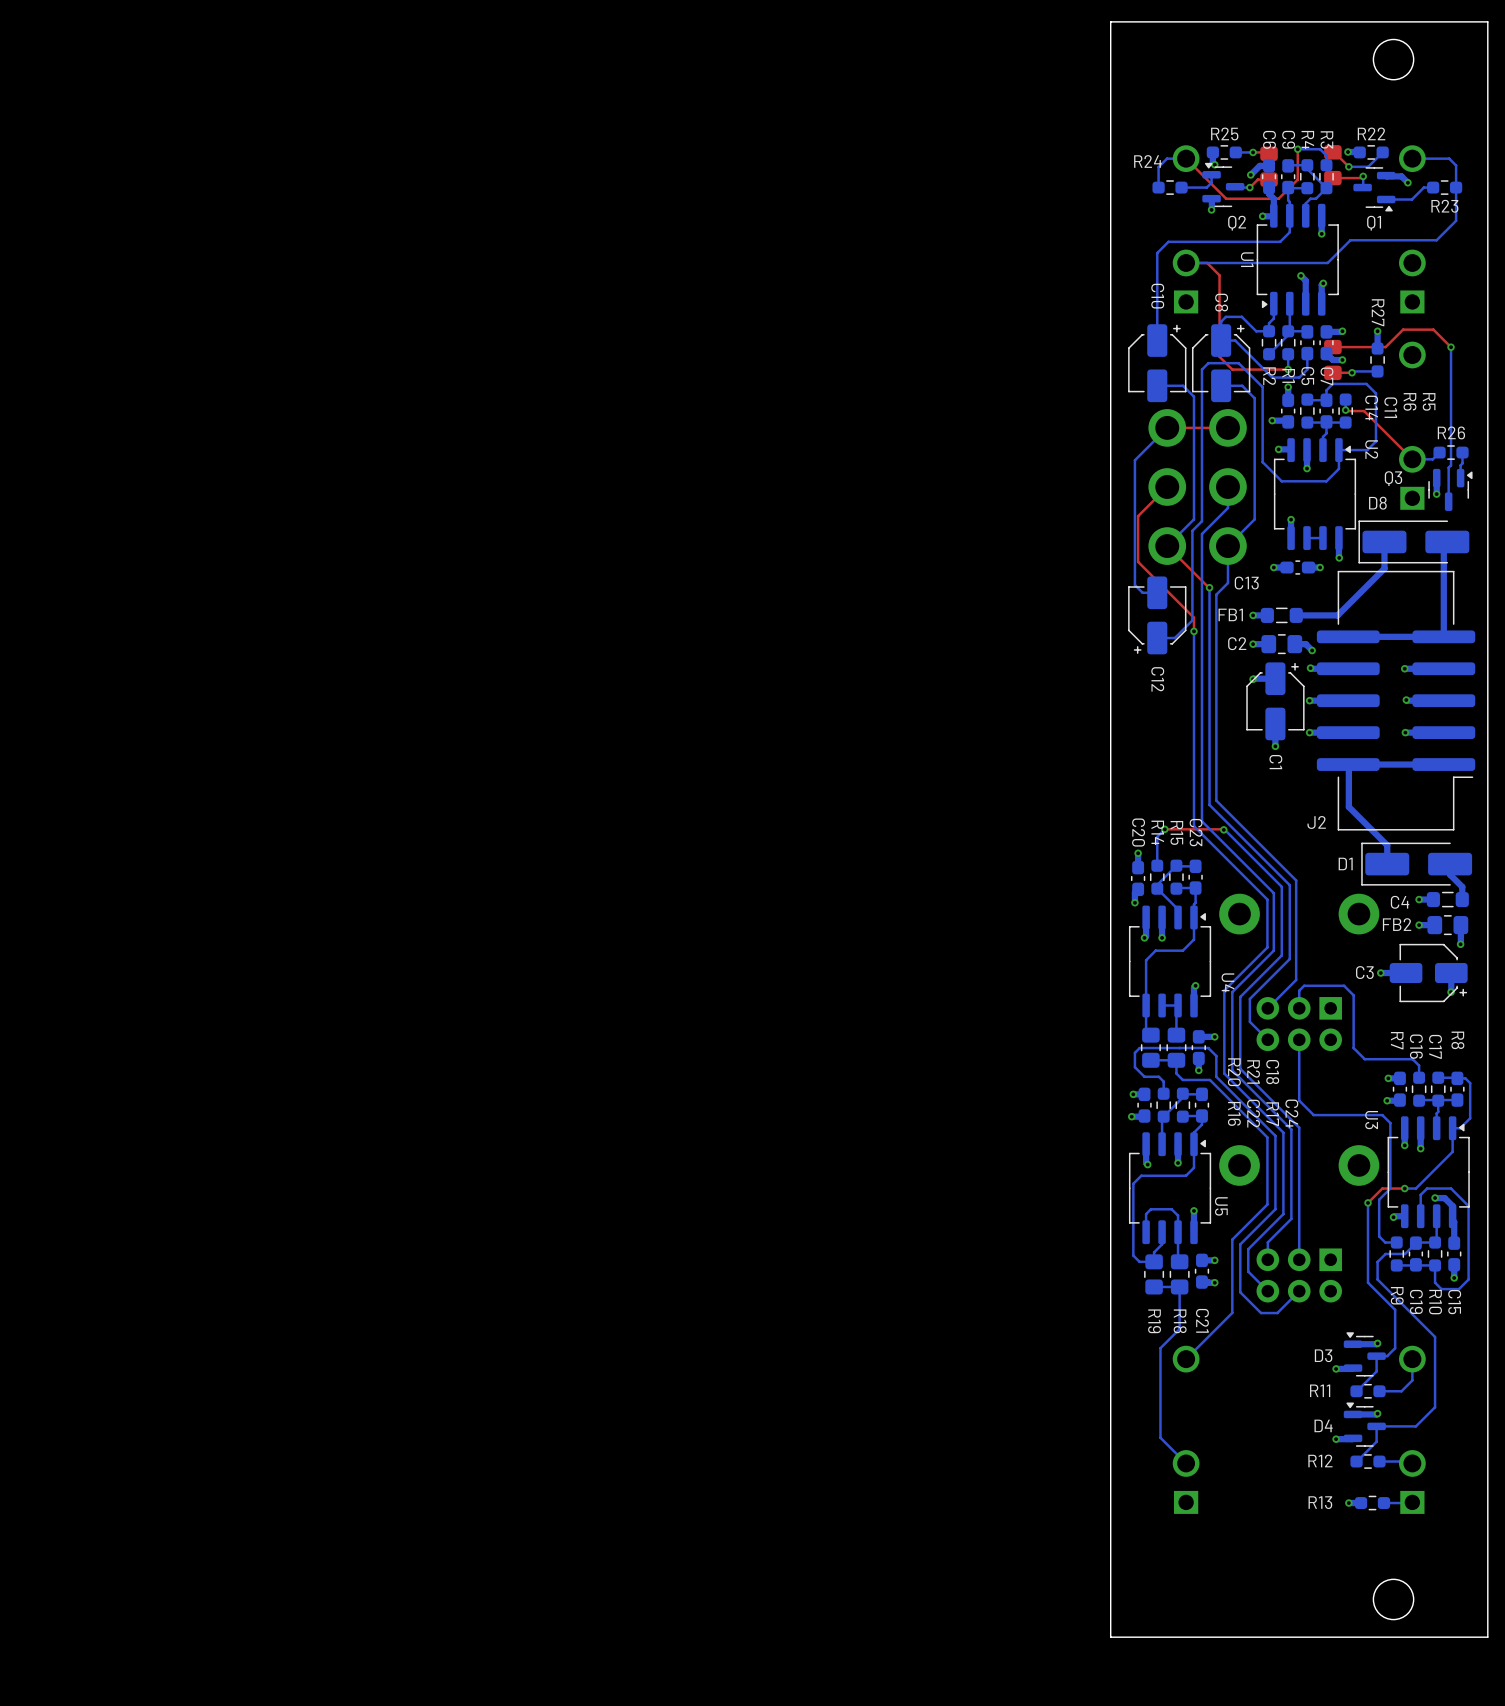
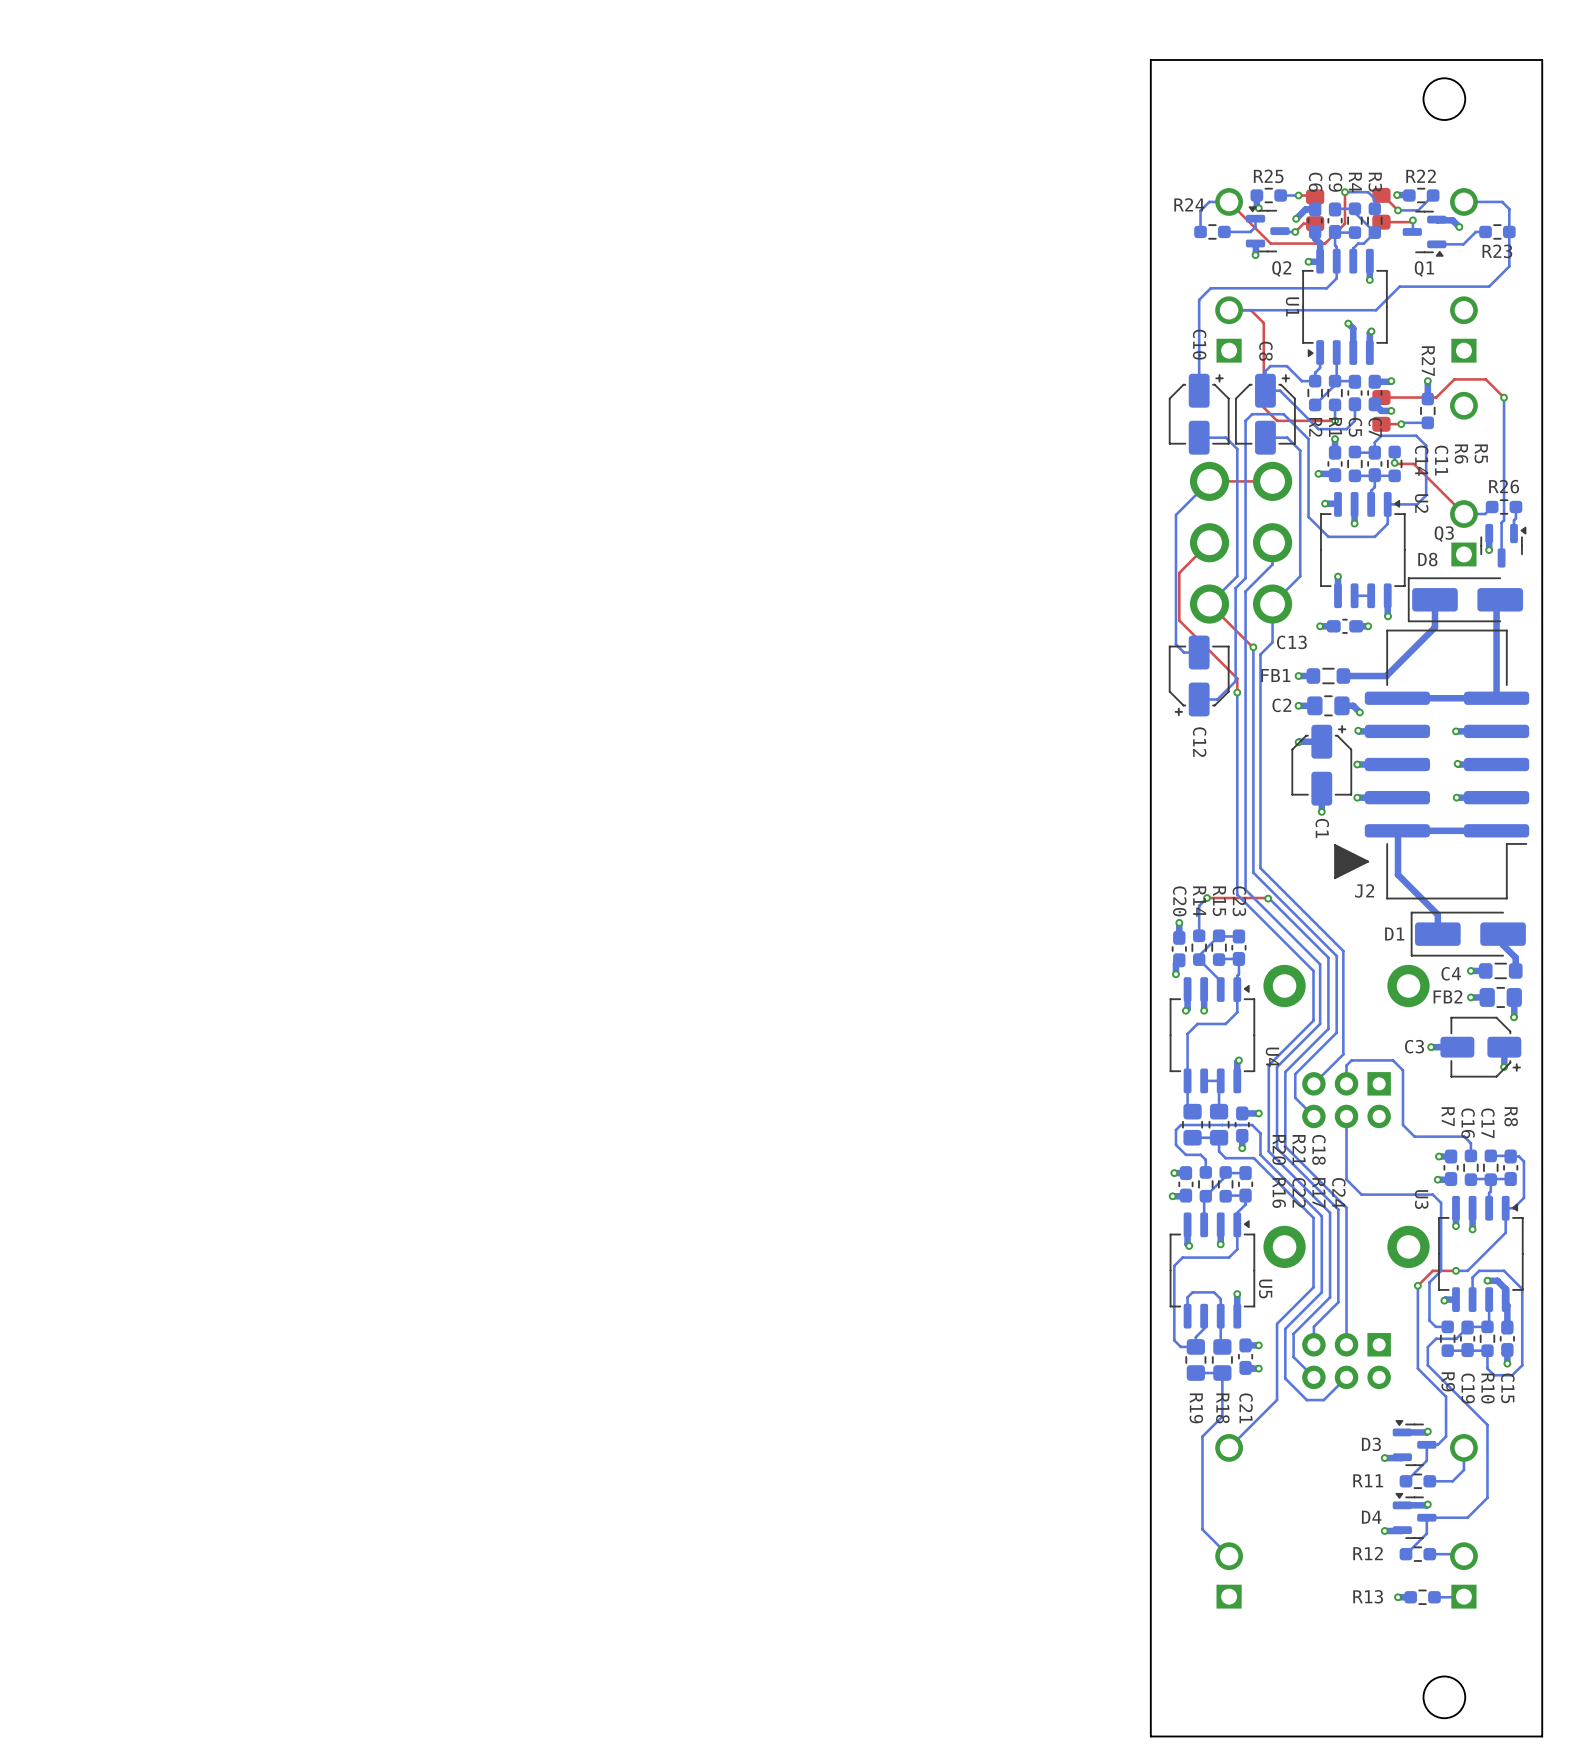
line: none -> (1335, 845) (1335, 878) (1368, 861) (1335, 845)
drawing: none -> [1335, 846, 1367, 878]

